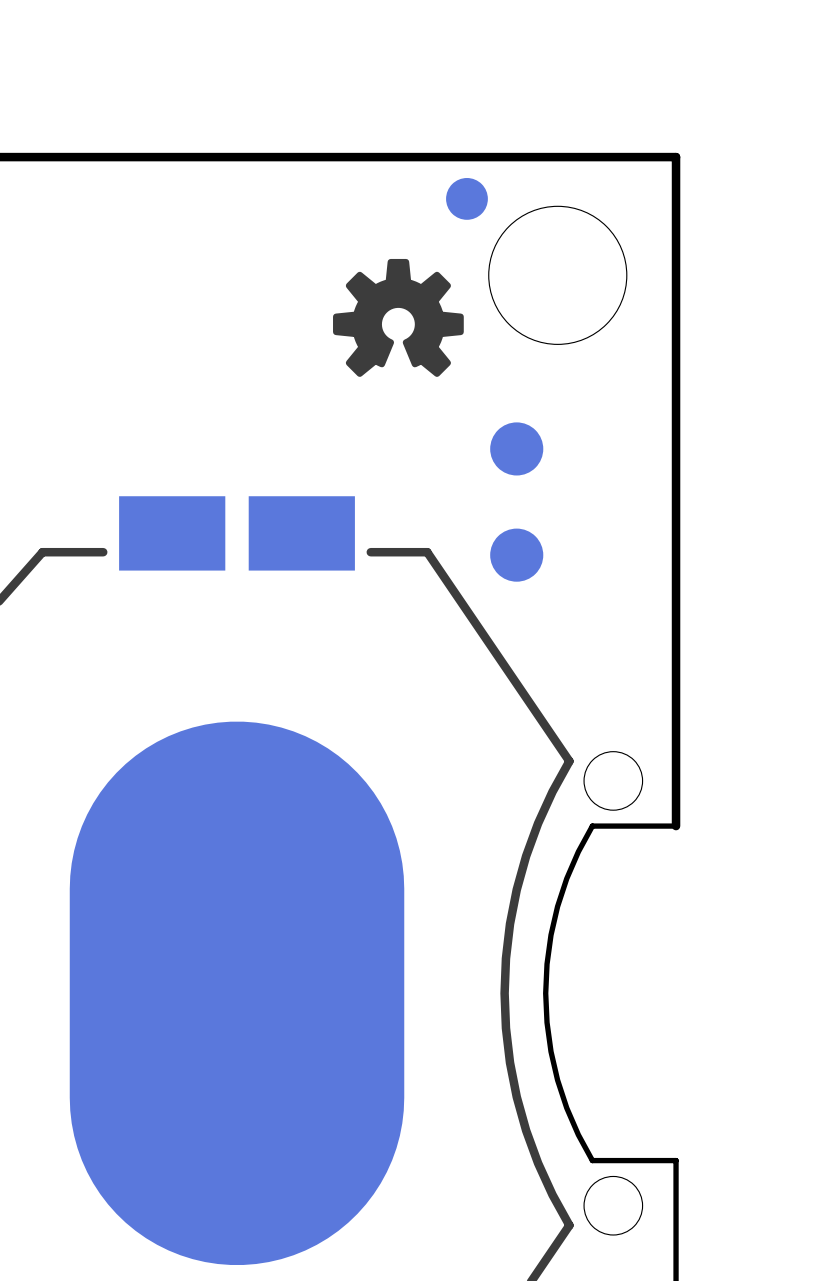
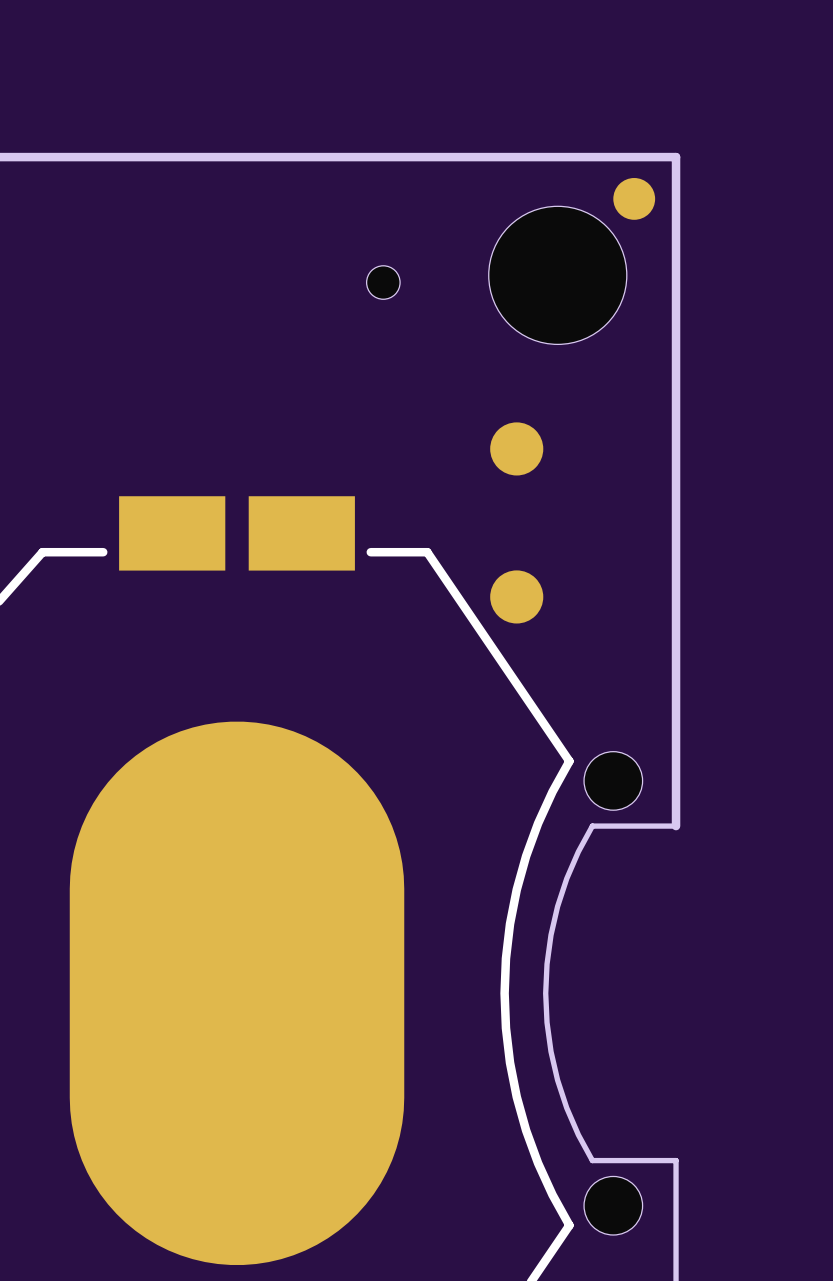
part position: (466, 198) -> (634, 198)
drawing: [333, 258, 464, 377] -> none
part: none -> (383, 282)
part position: (516, 555) -> (516, 596)

